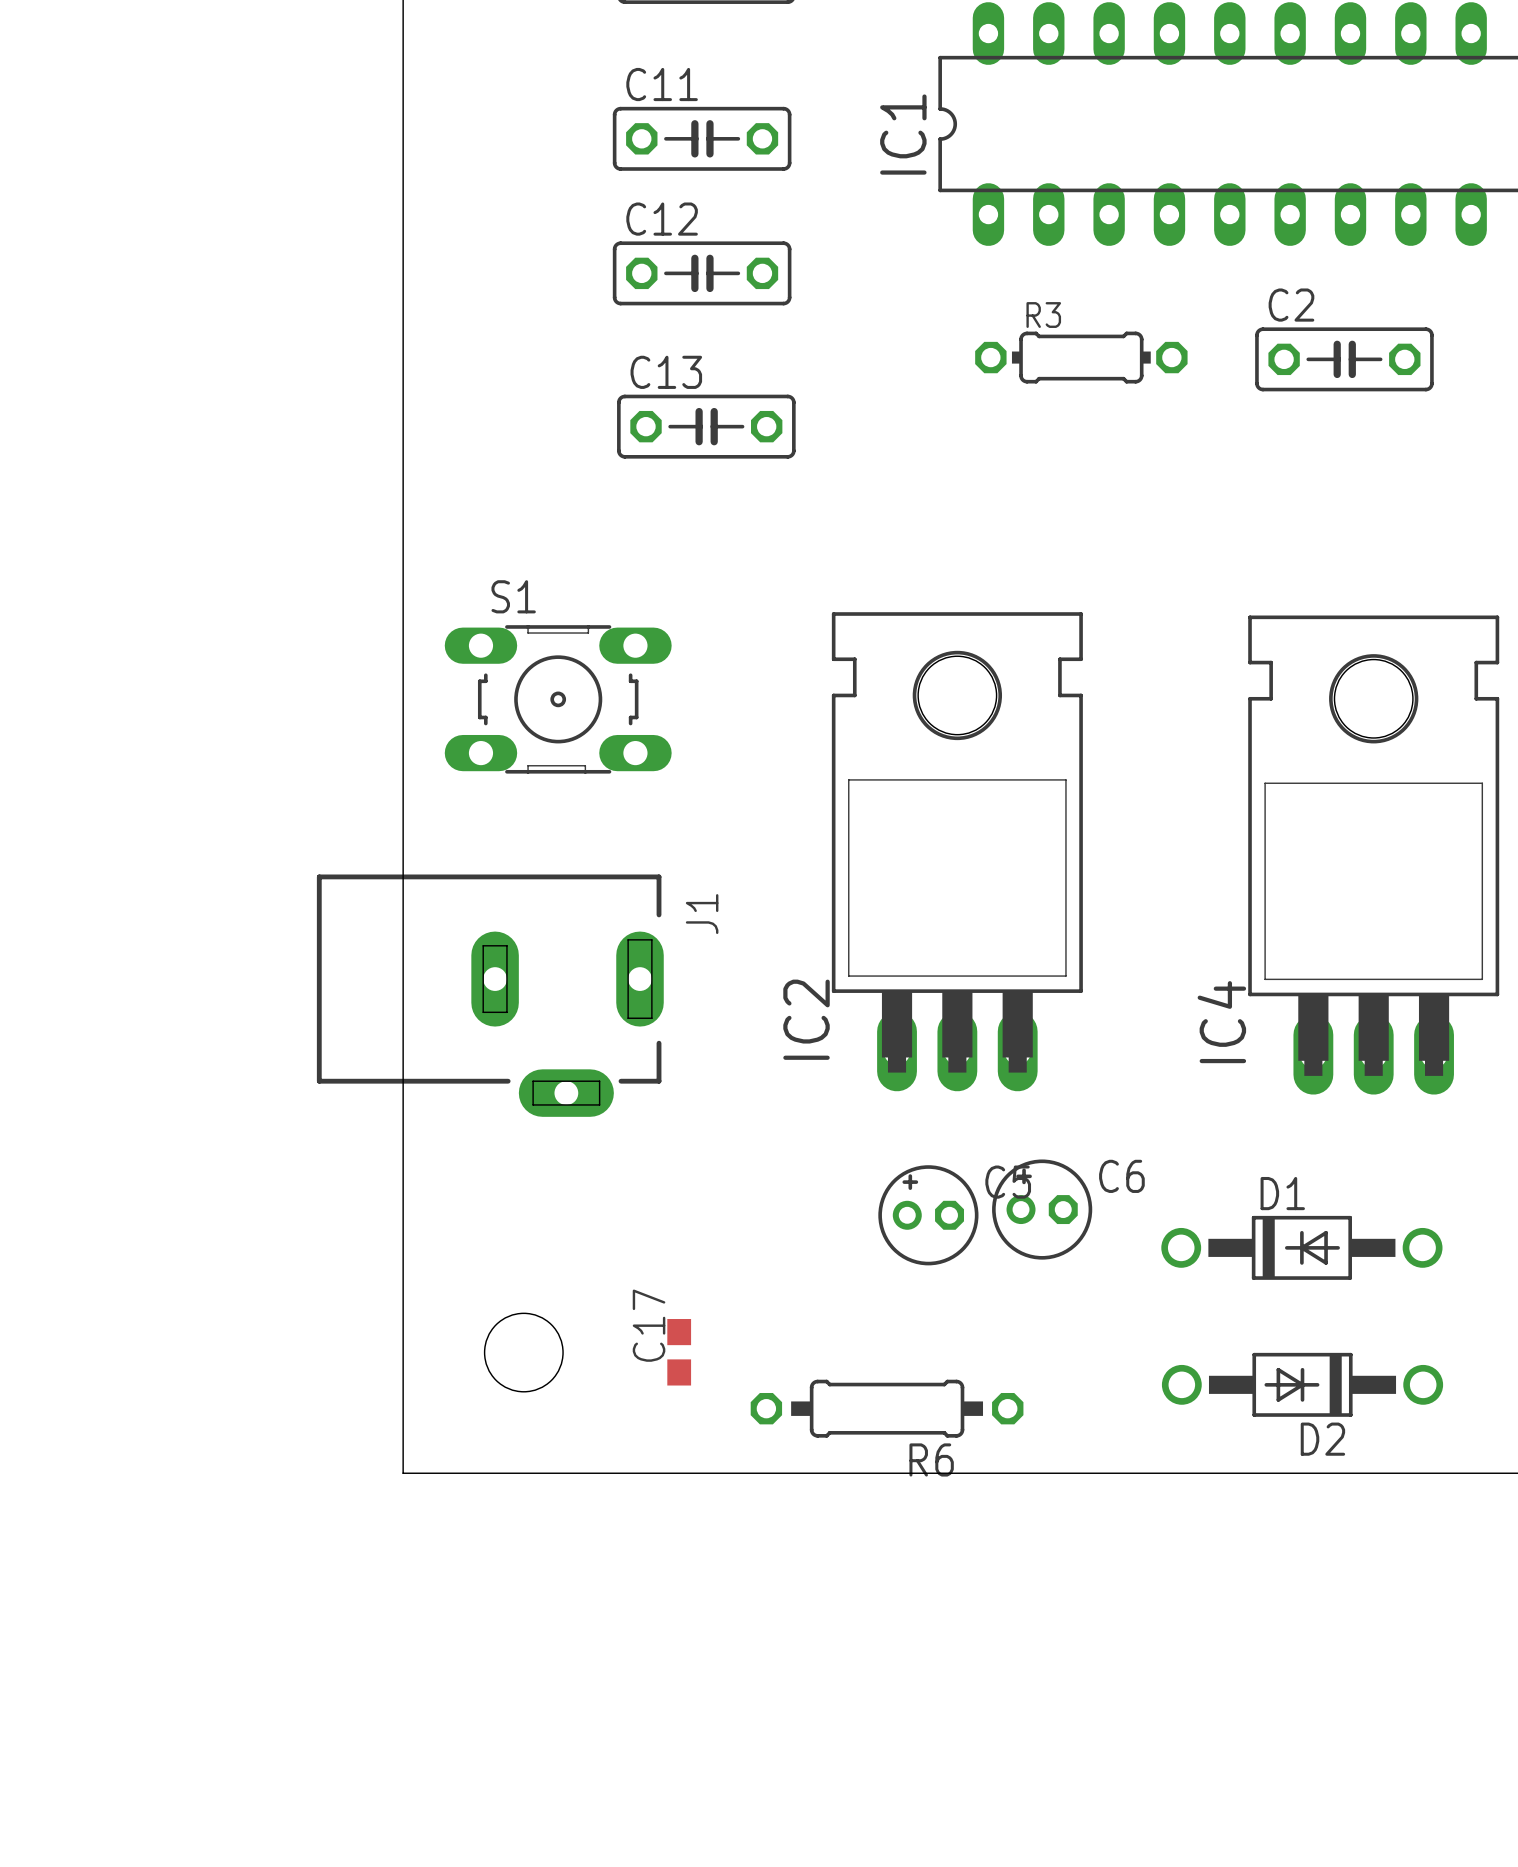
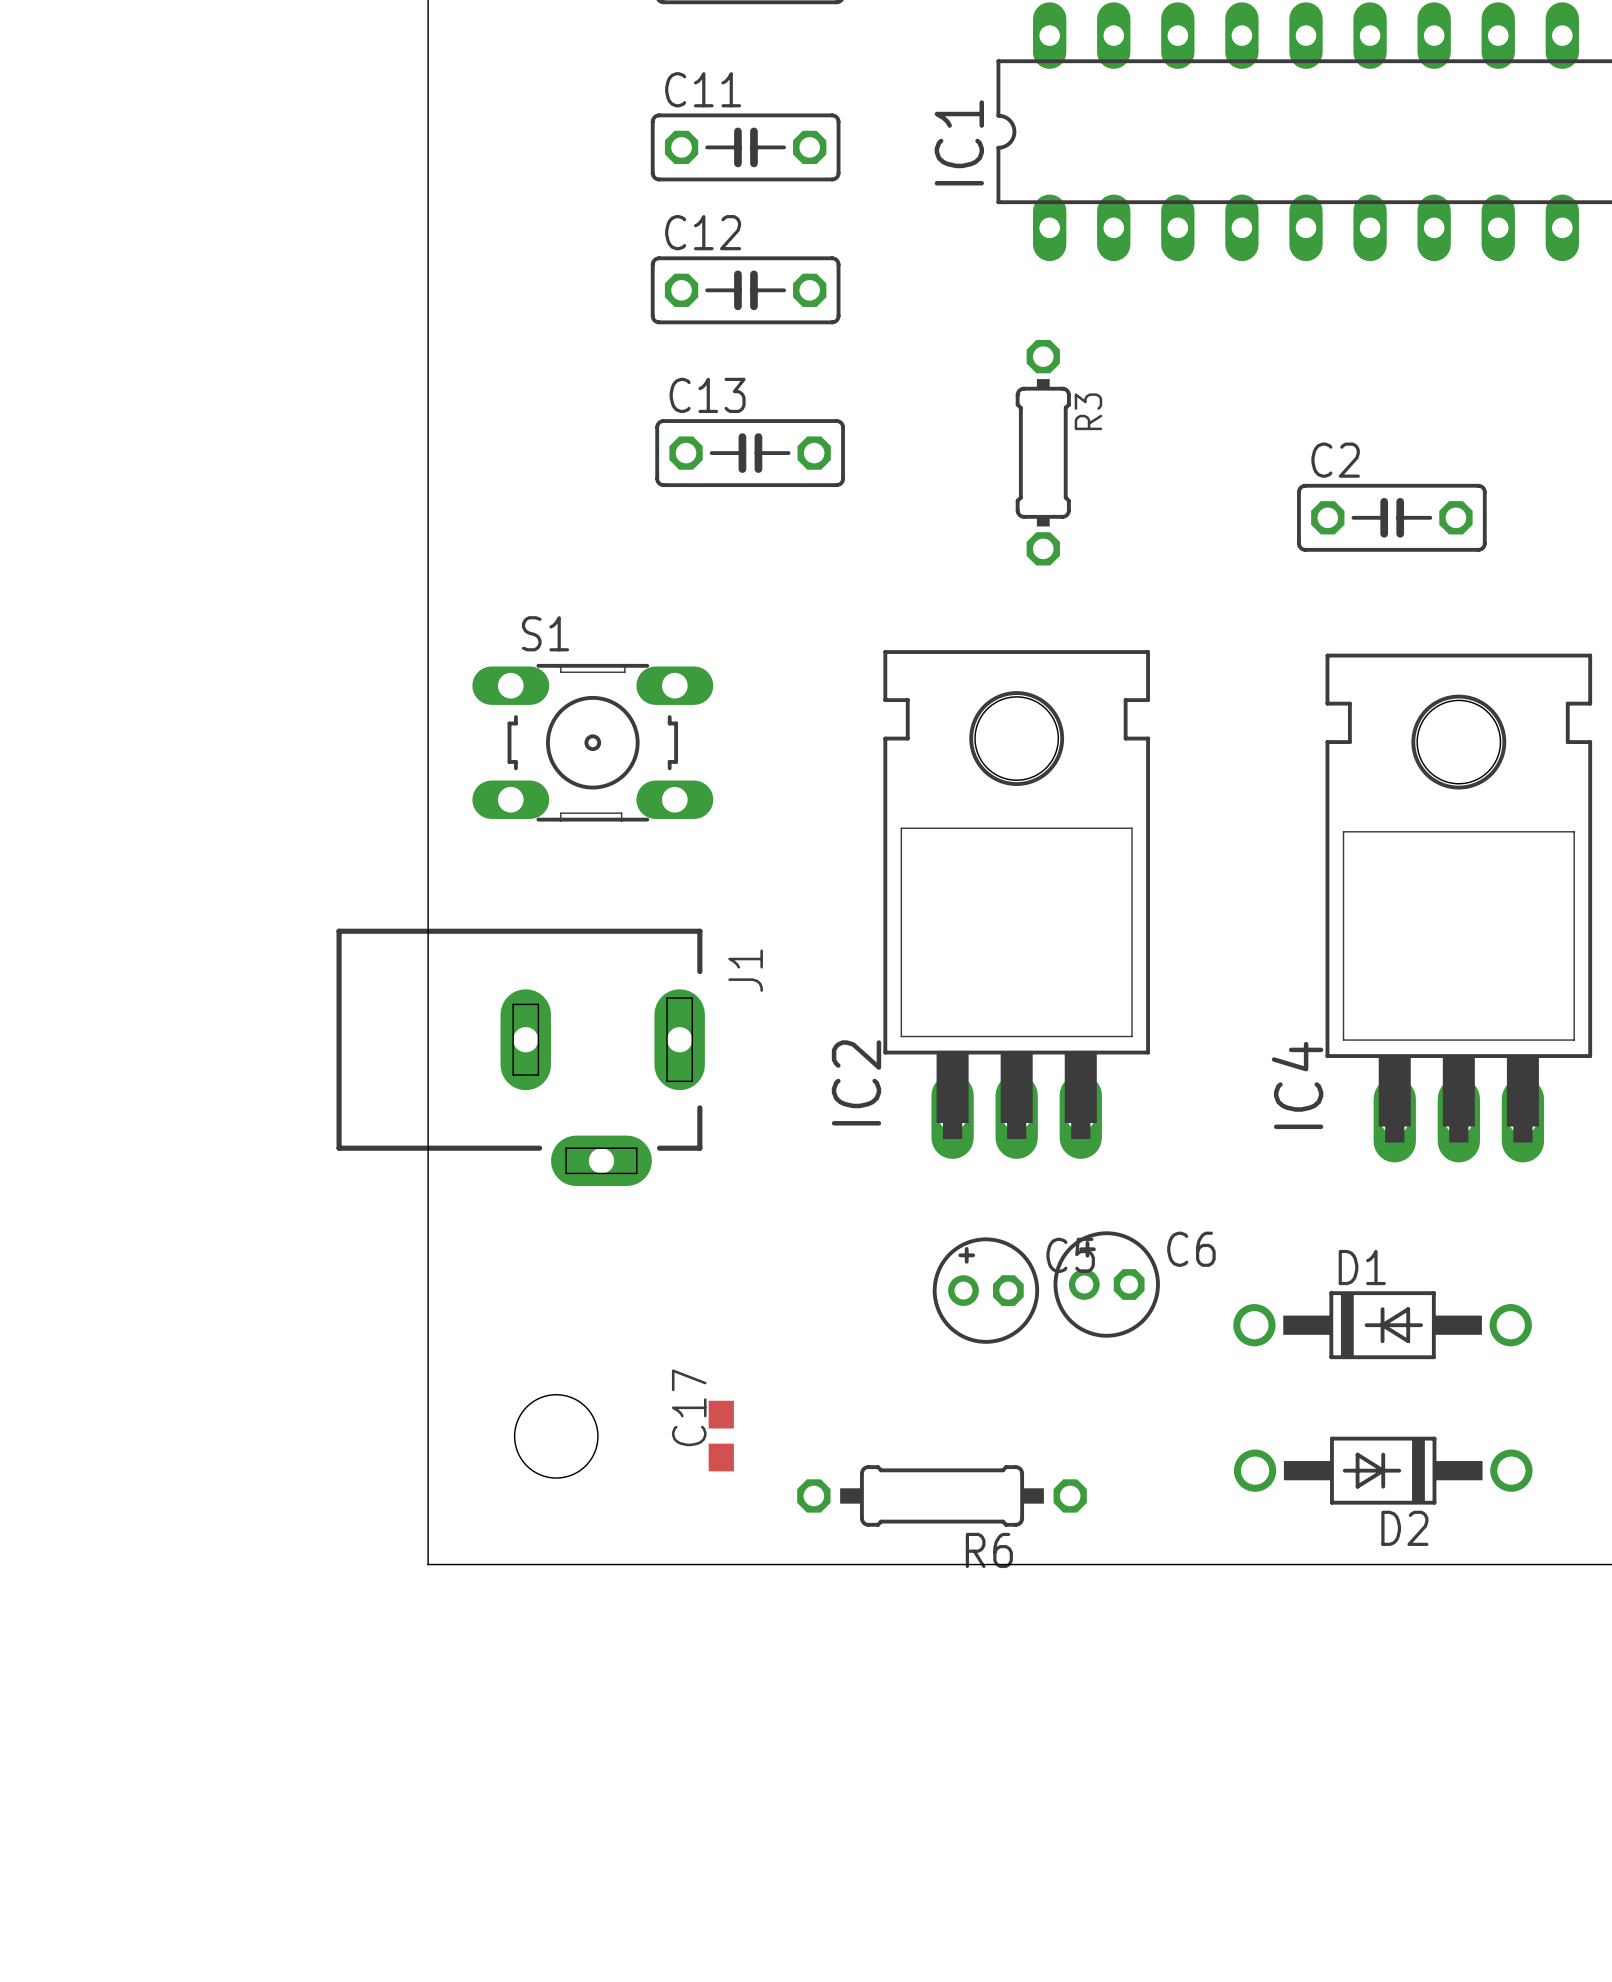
R3 rotation: 0° (1081, 357) -> 90° clockwise (1043, 452)
C2 position: (1344, 359) -> (1391, 517)

